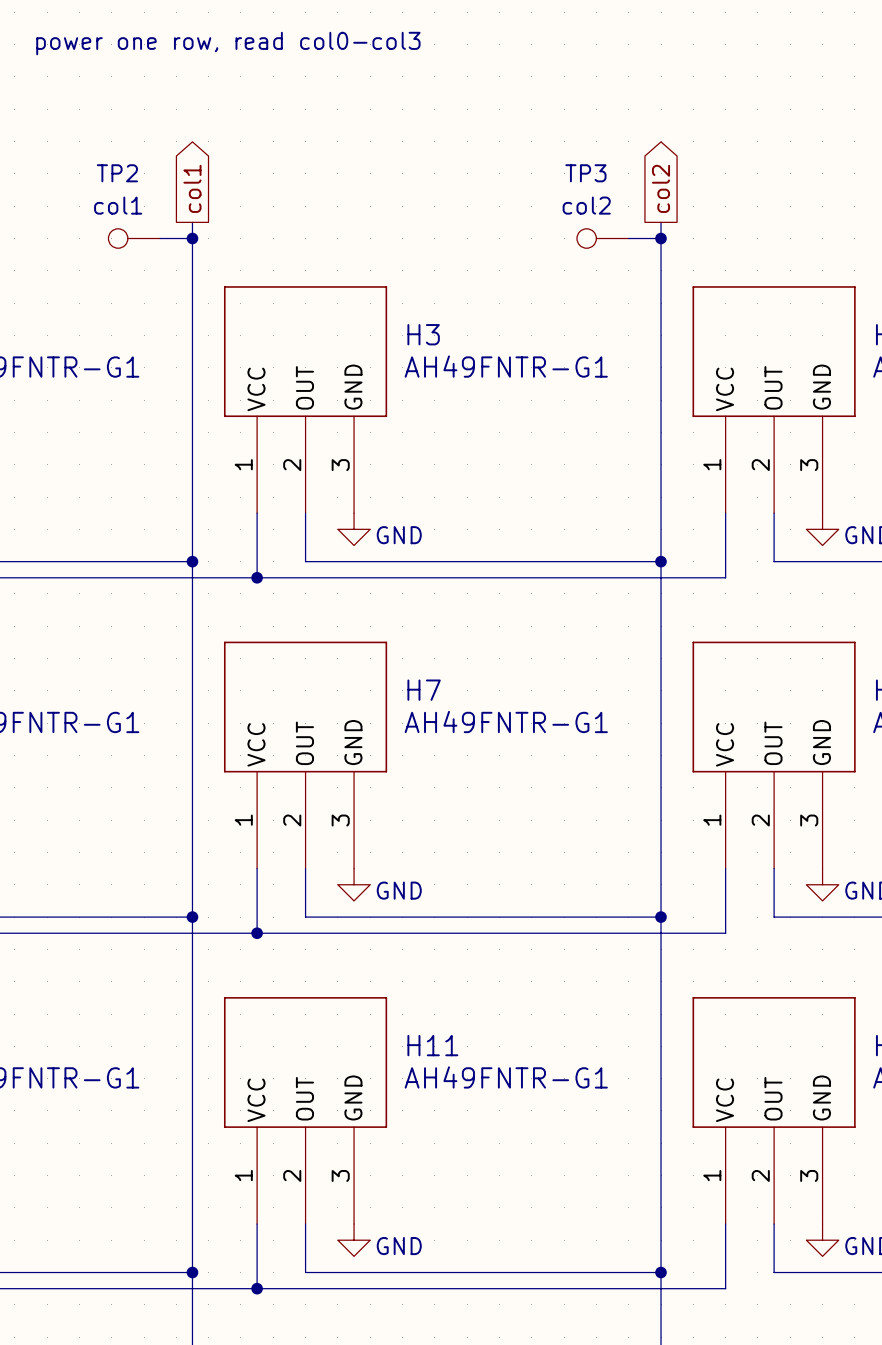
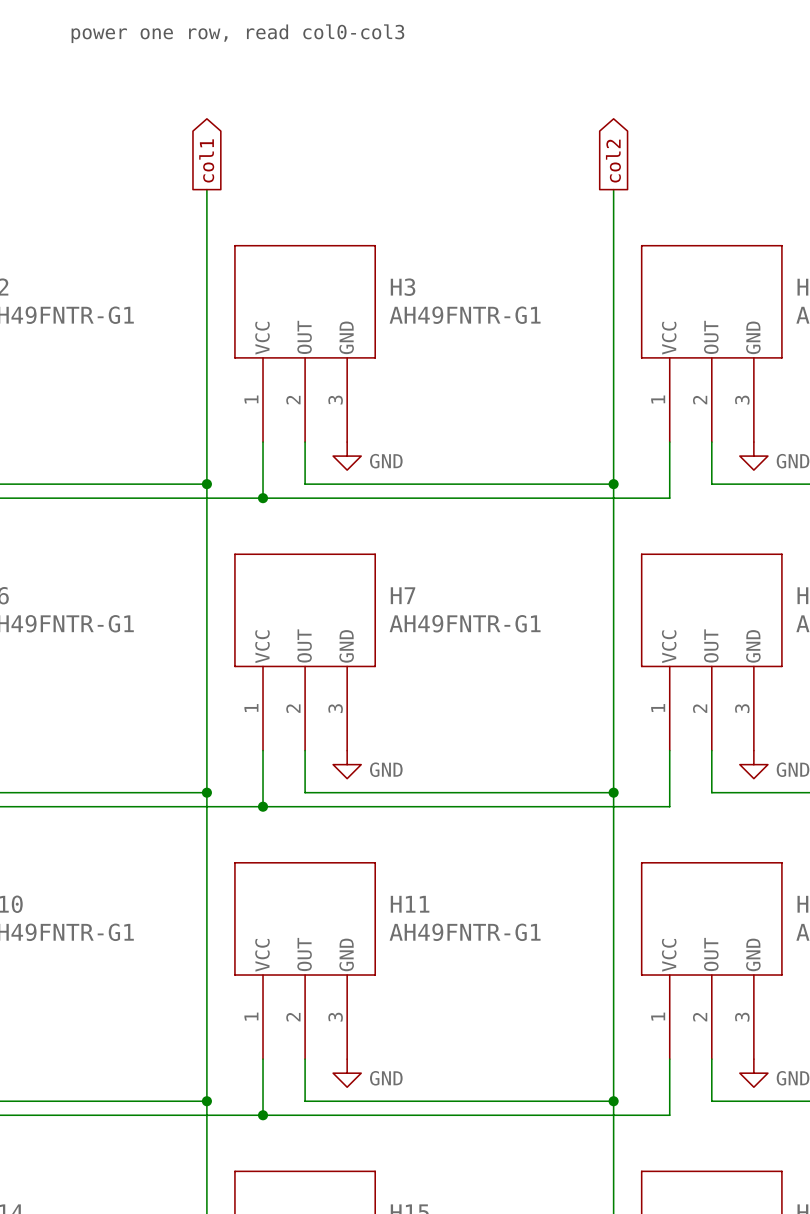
TP2: col1 (134, 238) -> none
wire: (160, 238) (192, 238) -> none
junction: (192, 238) -> none
TP3: col2 (602, 238) -> none
wire: (628, 238) (661, 238) -> none
junction: (661, 238) -> none

